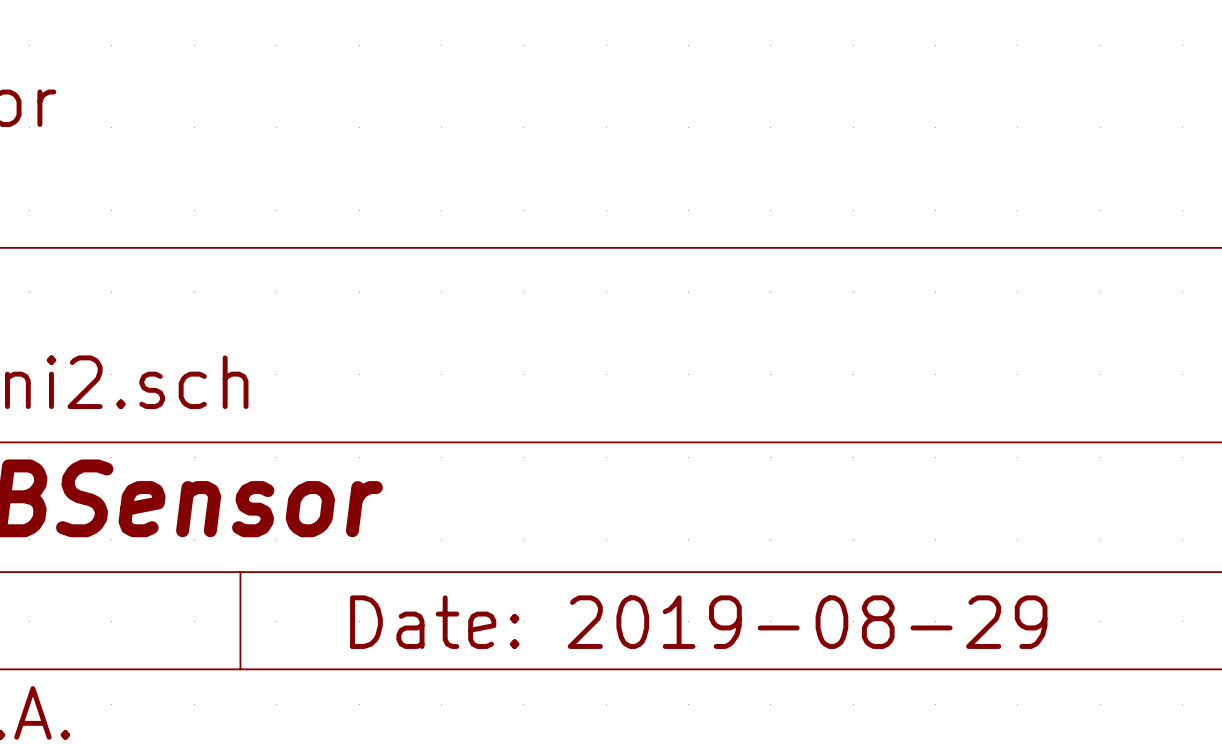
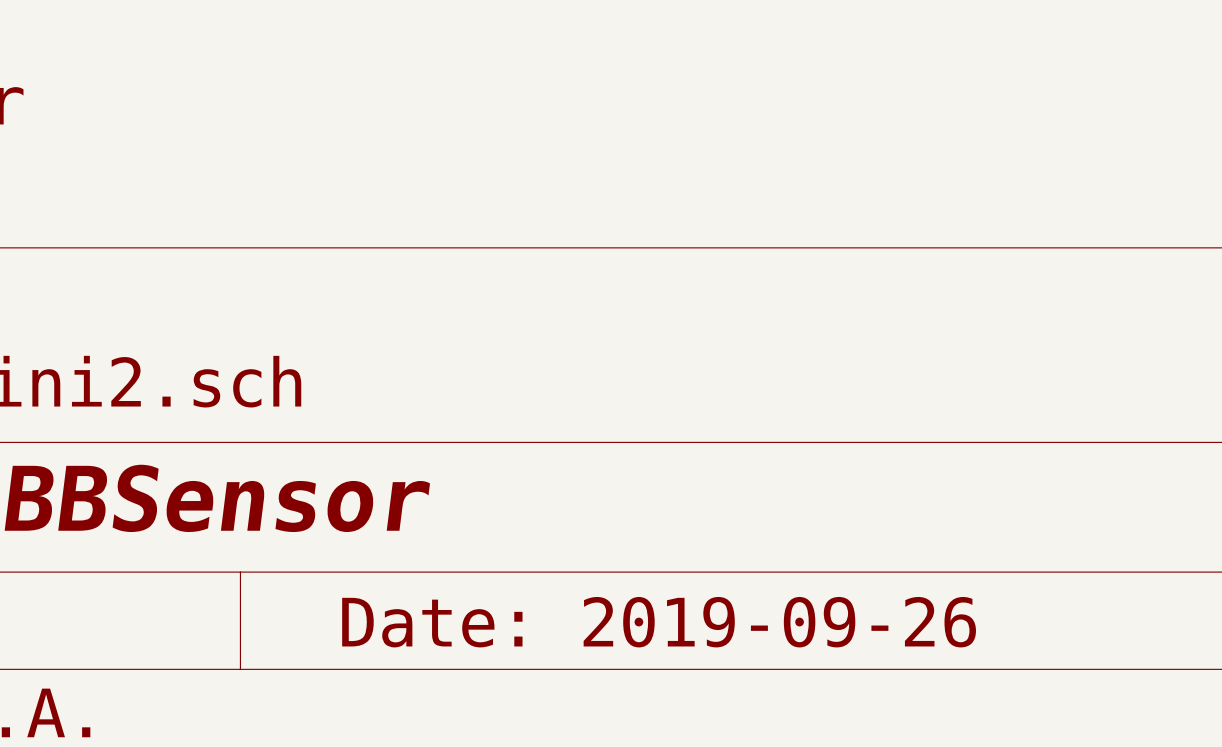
title block: Date: 2019-08-29 (698, 622) -> Date: 2019-09-26 (659, 622)

